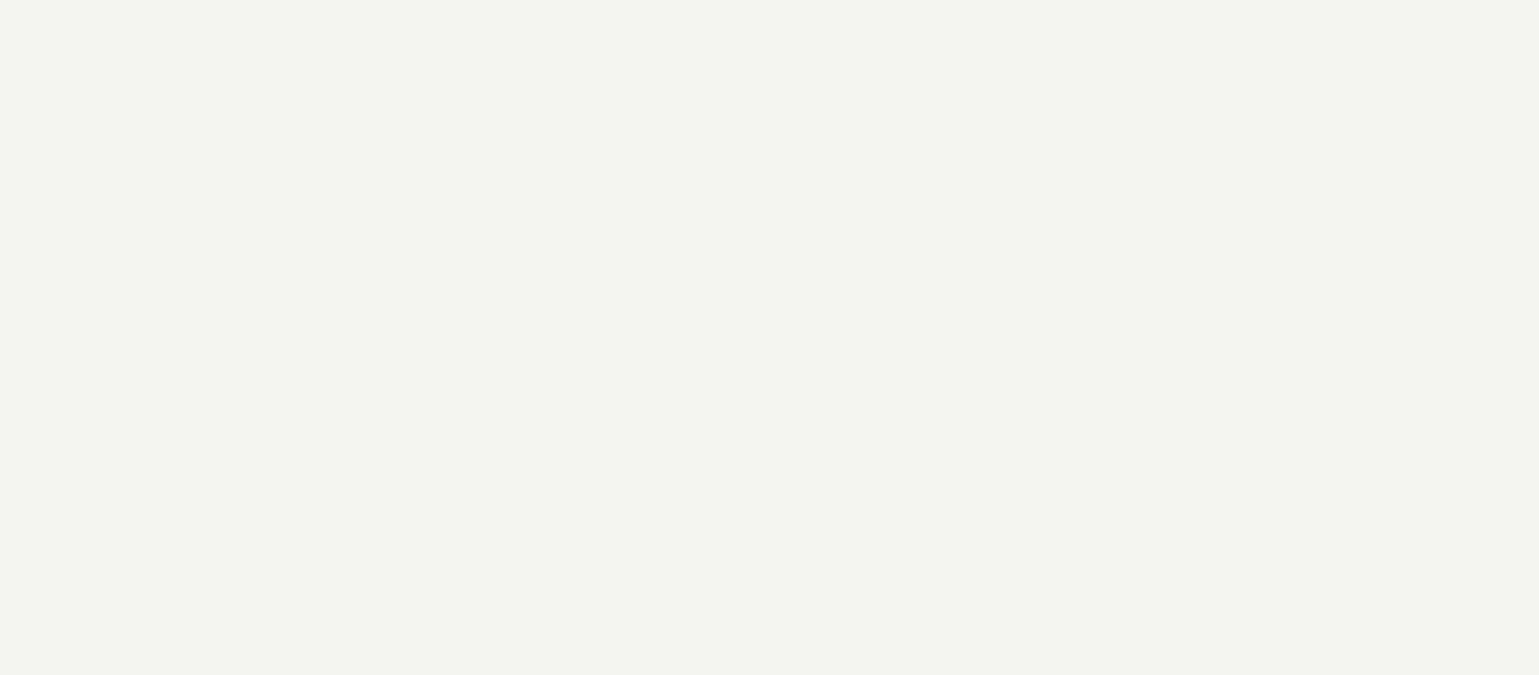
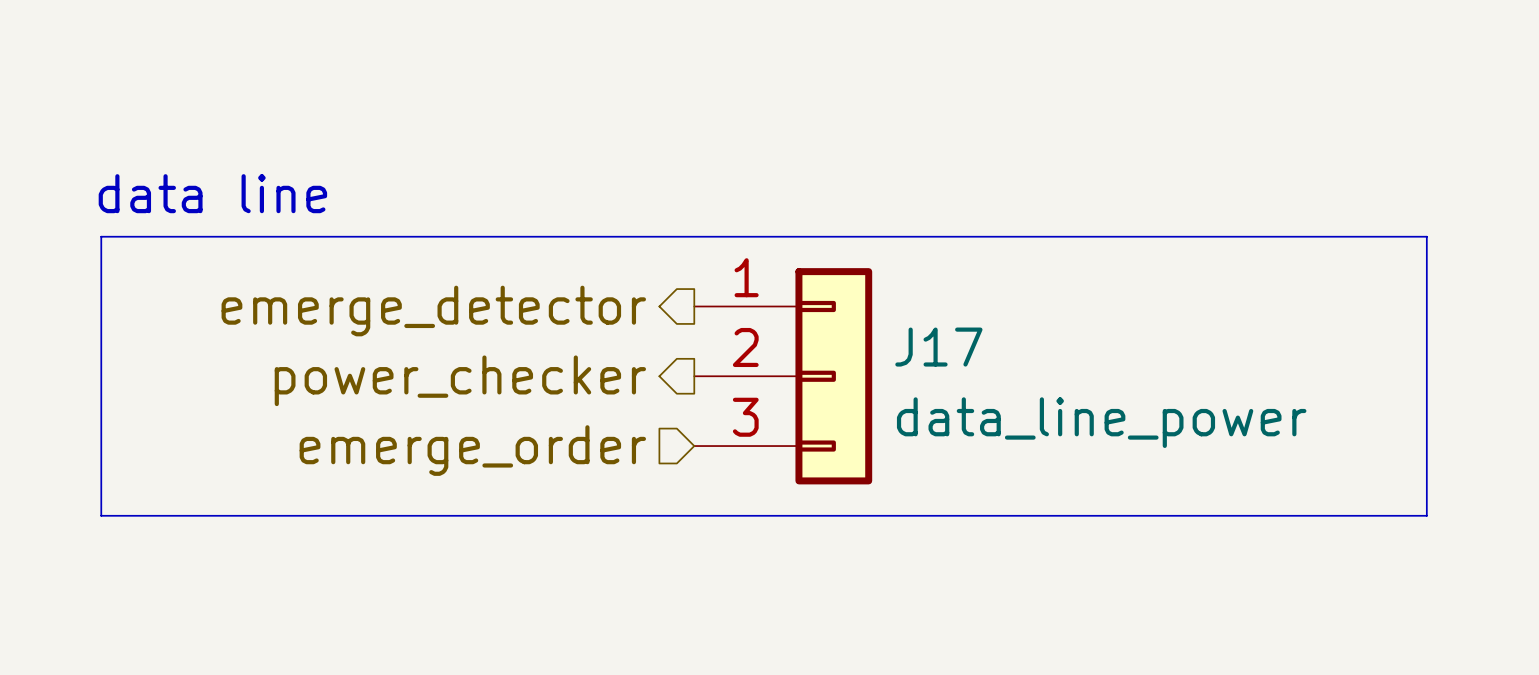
text: none -> data line (212, 193)
line: none -> (101, 236) (1426, 236) (1426, 515) (101, 515) (101, 236)
hierarchical label: none -> emerge_detector (433, 311)
J17: none -> data_line_power (783, 376)
hierarchical label: none -> power_checker (460, 380)
hierarchical label: none -> emerge_order (472, 450)

